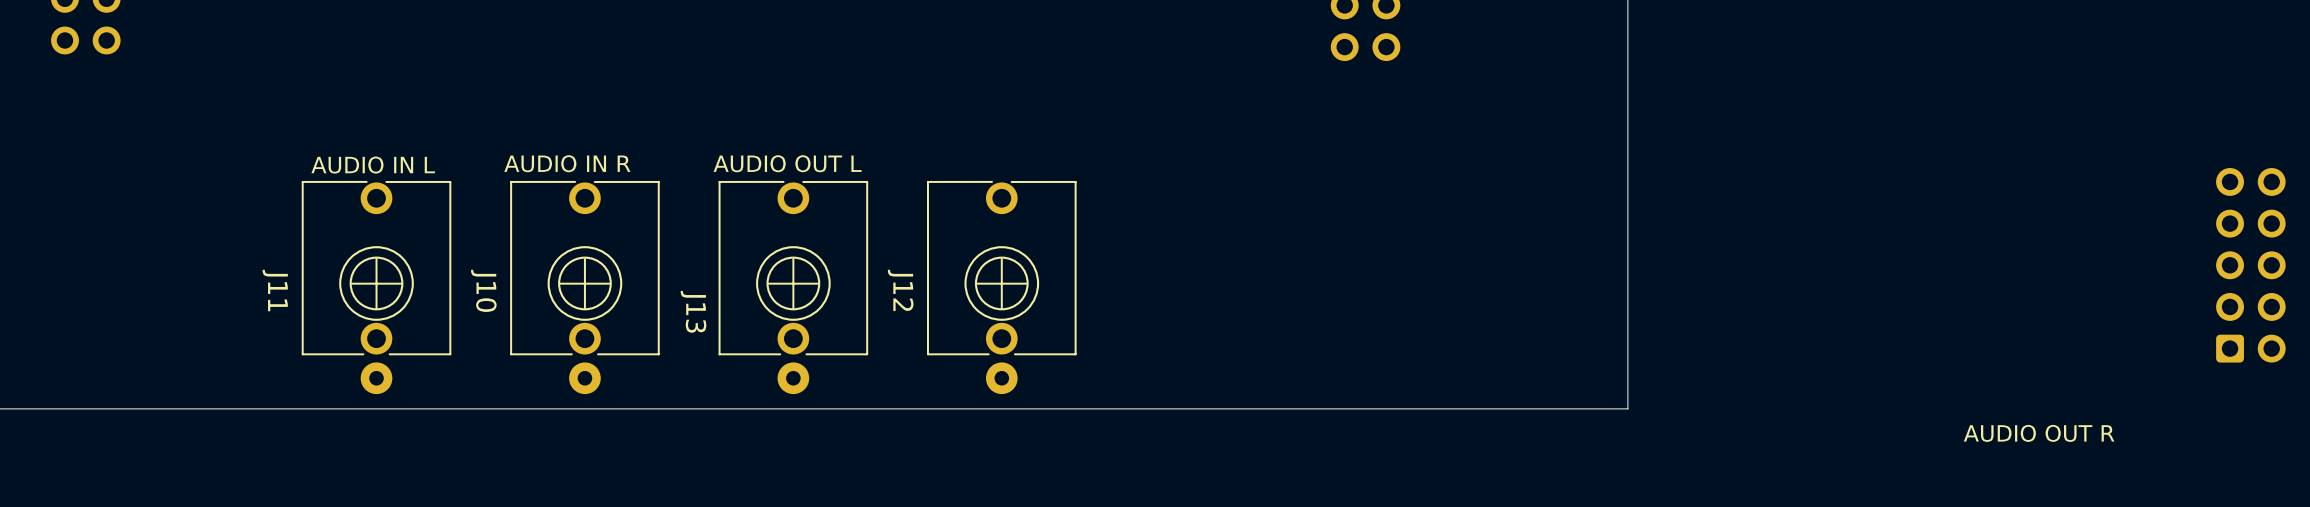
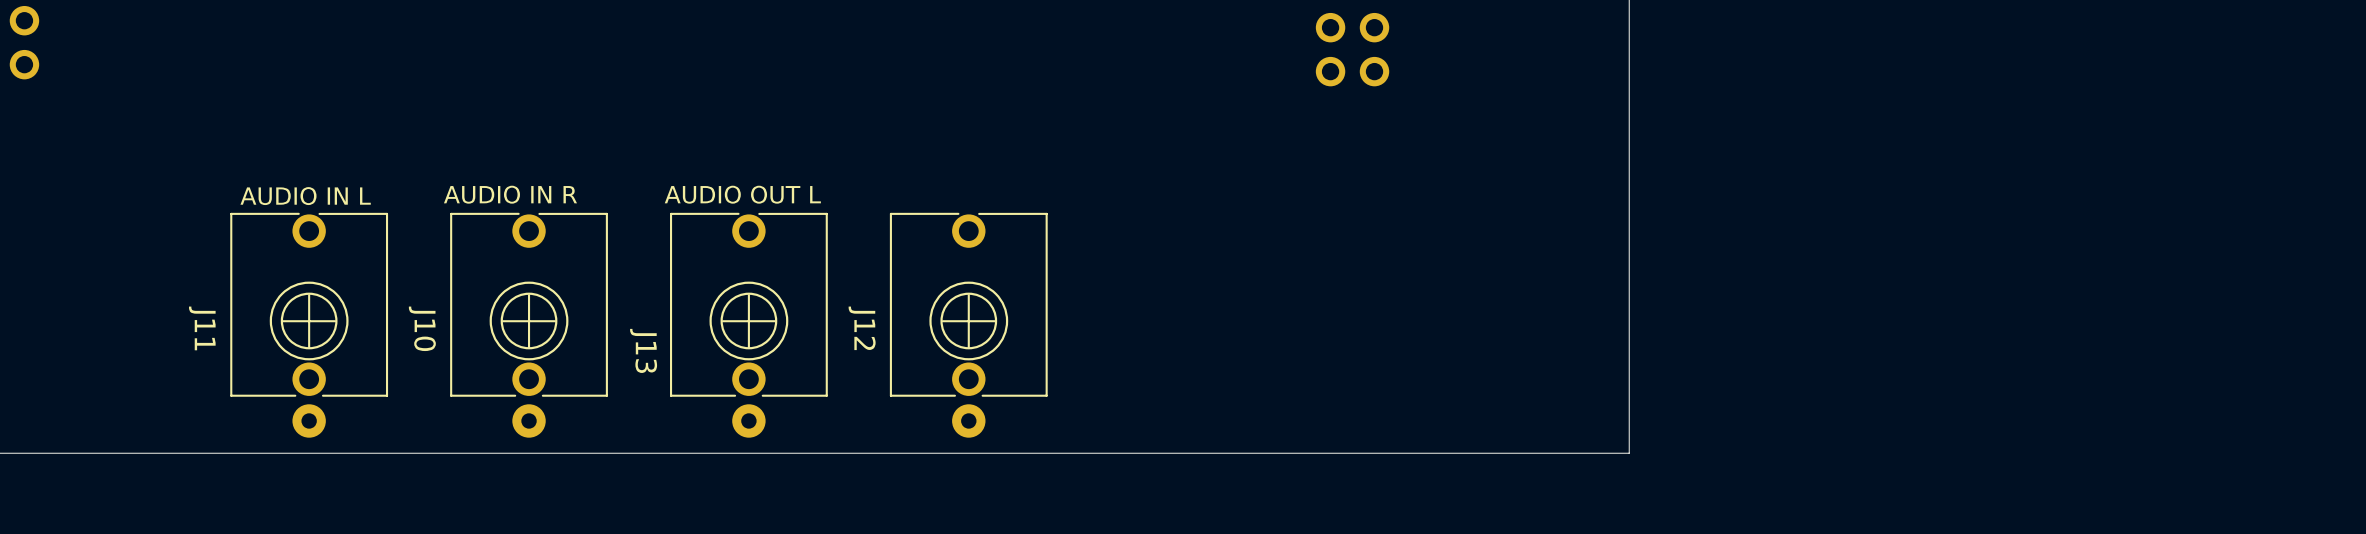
part: (2250, 265) -> none
text: AUDIO OUT R (2039, 433) -> none

